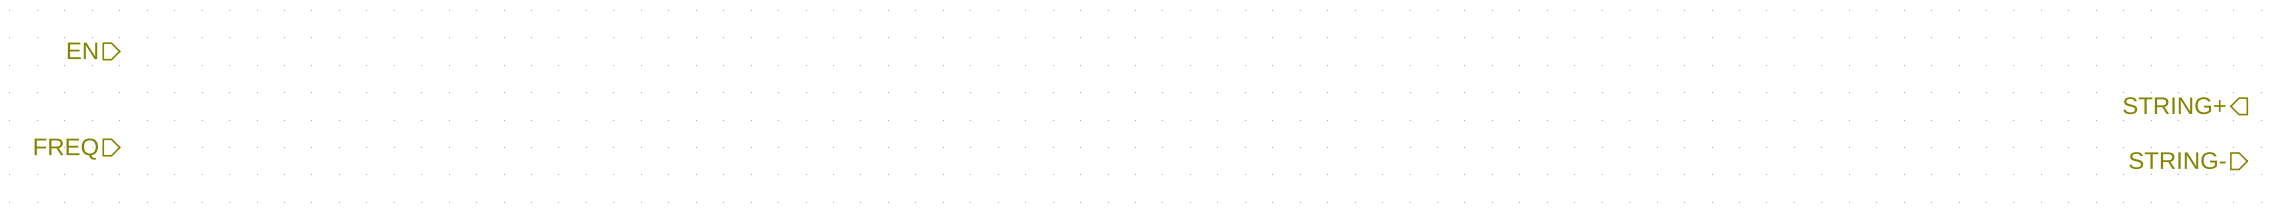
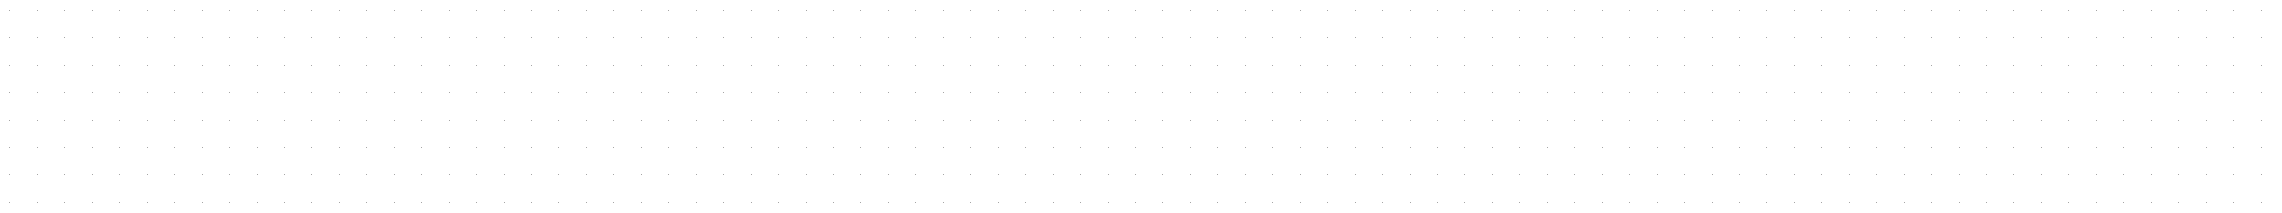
hierarchical label: EN (82, 50) -> none
hierarchical label: STRING+ (2174, 105) -> none
hierarchical label: FREQ (66, 149) -> none
hierarchical label: STRING- (2177, 160) -> none

